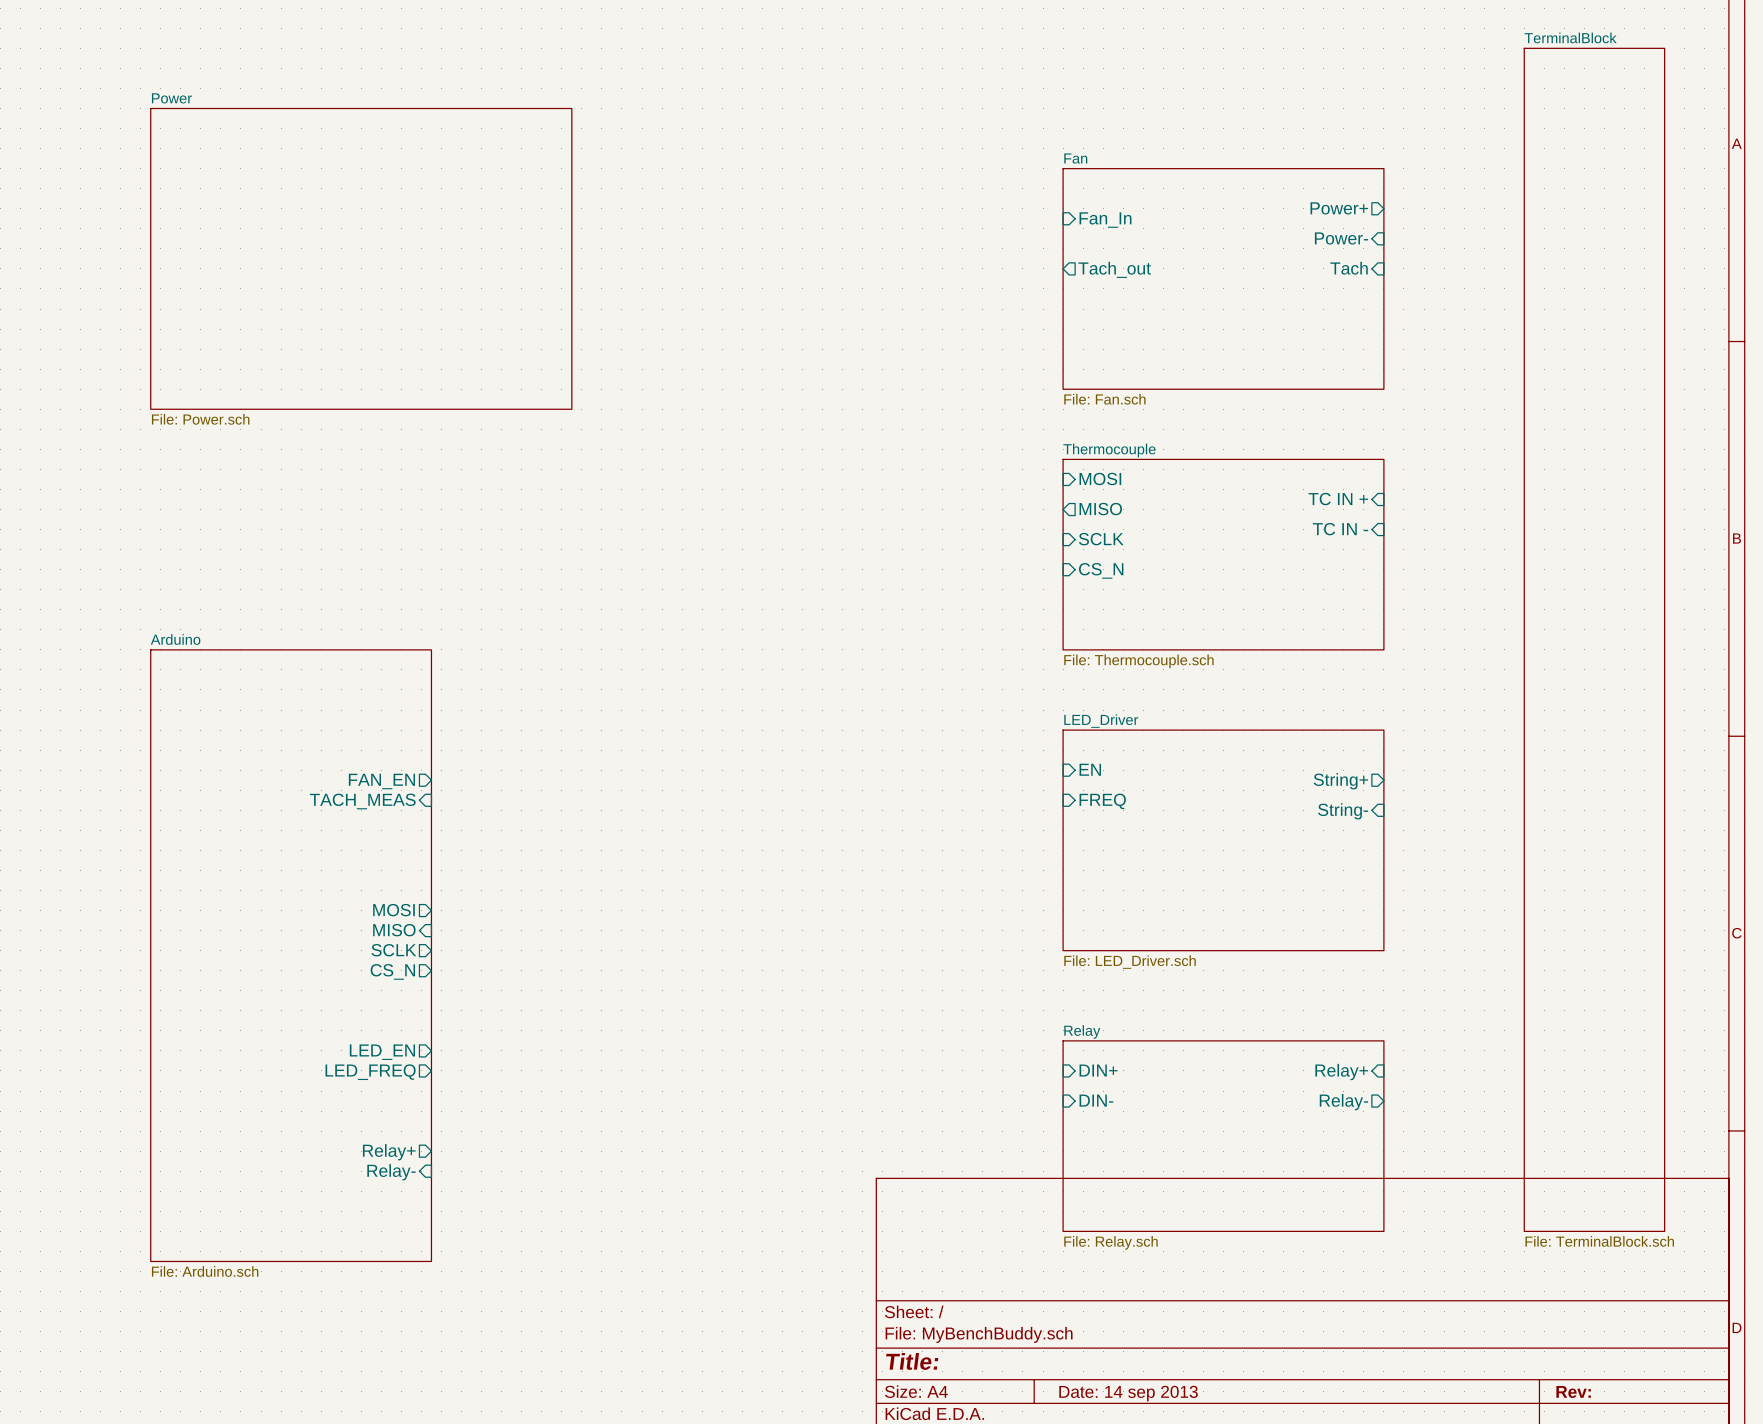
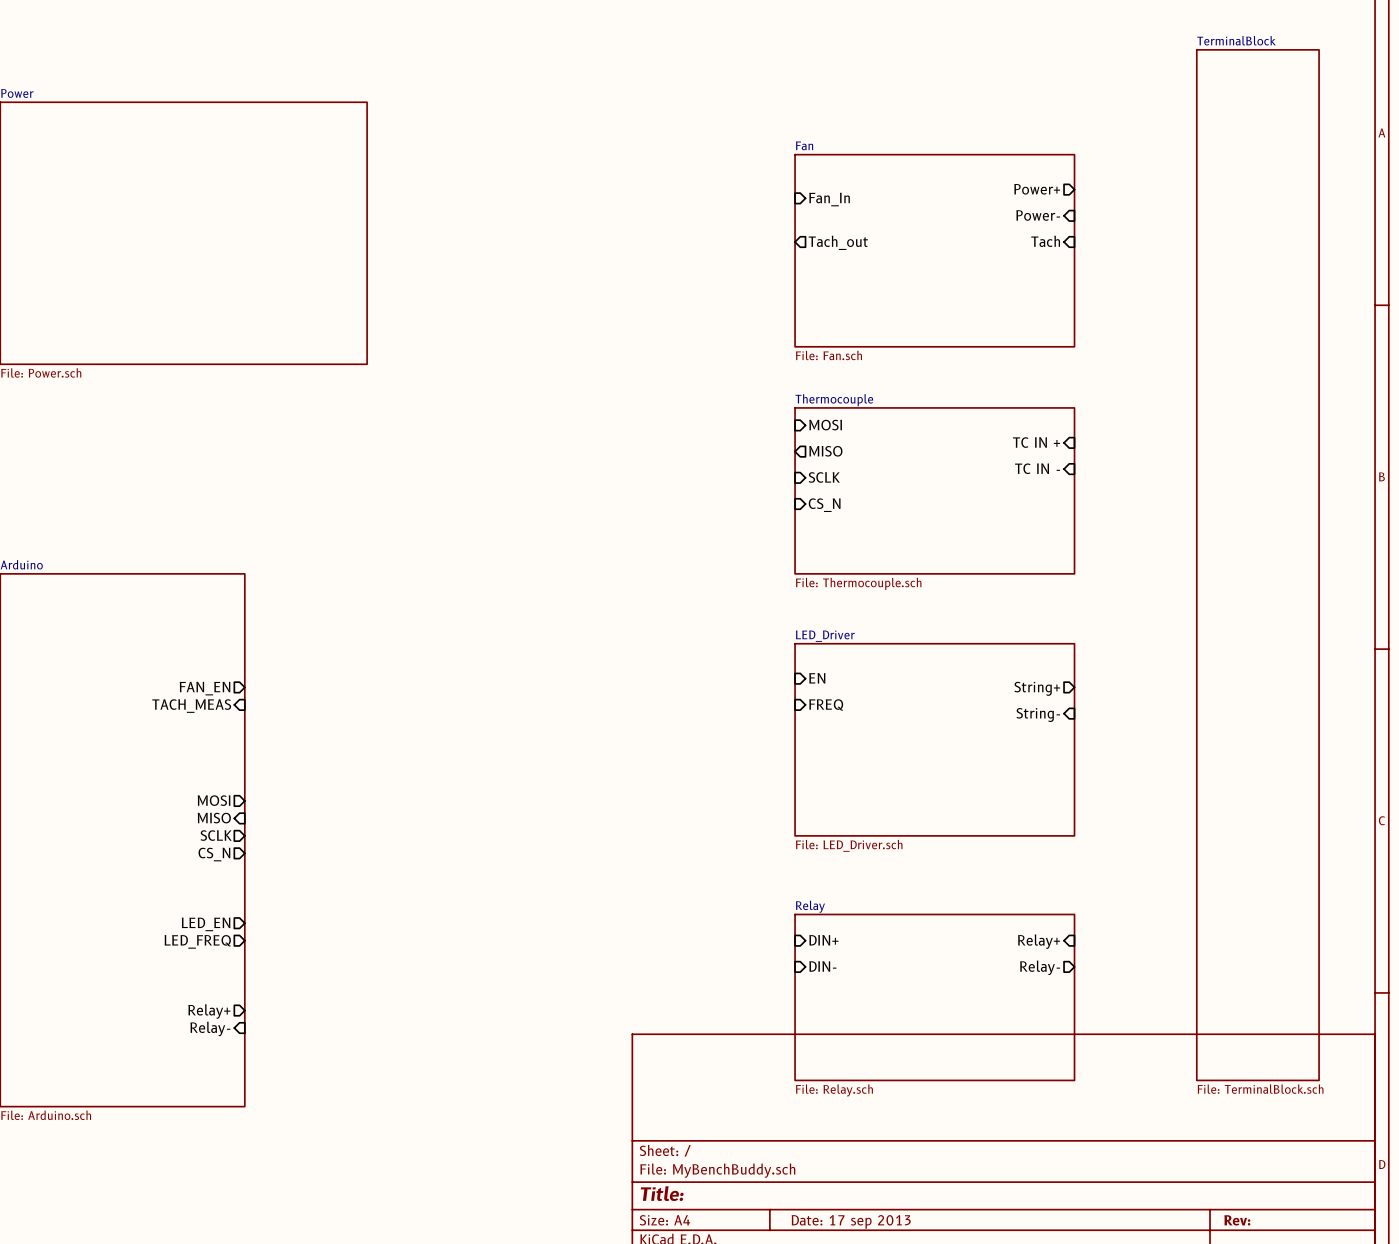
title block: Date: 14 sep 2013 (1128, 1393) -> Date: 17 sep 2013 (851, 1221)

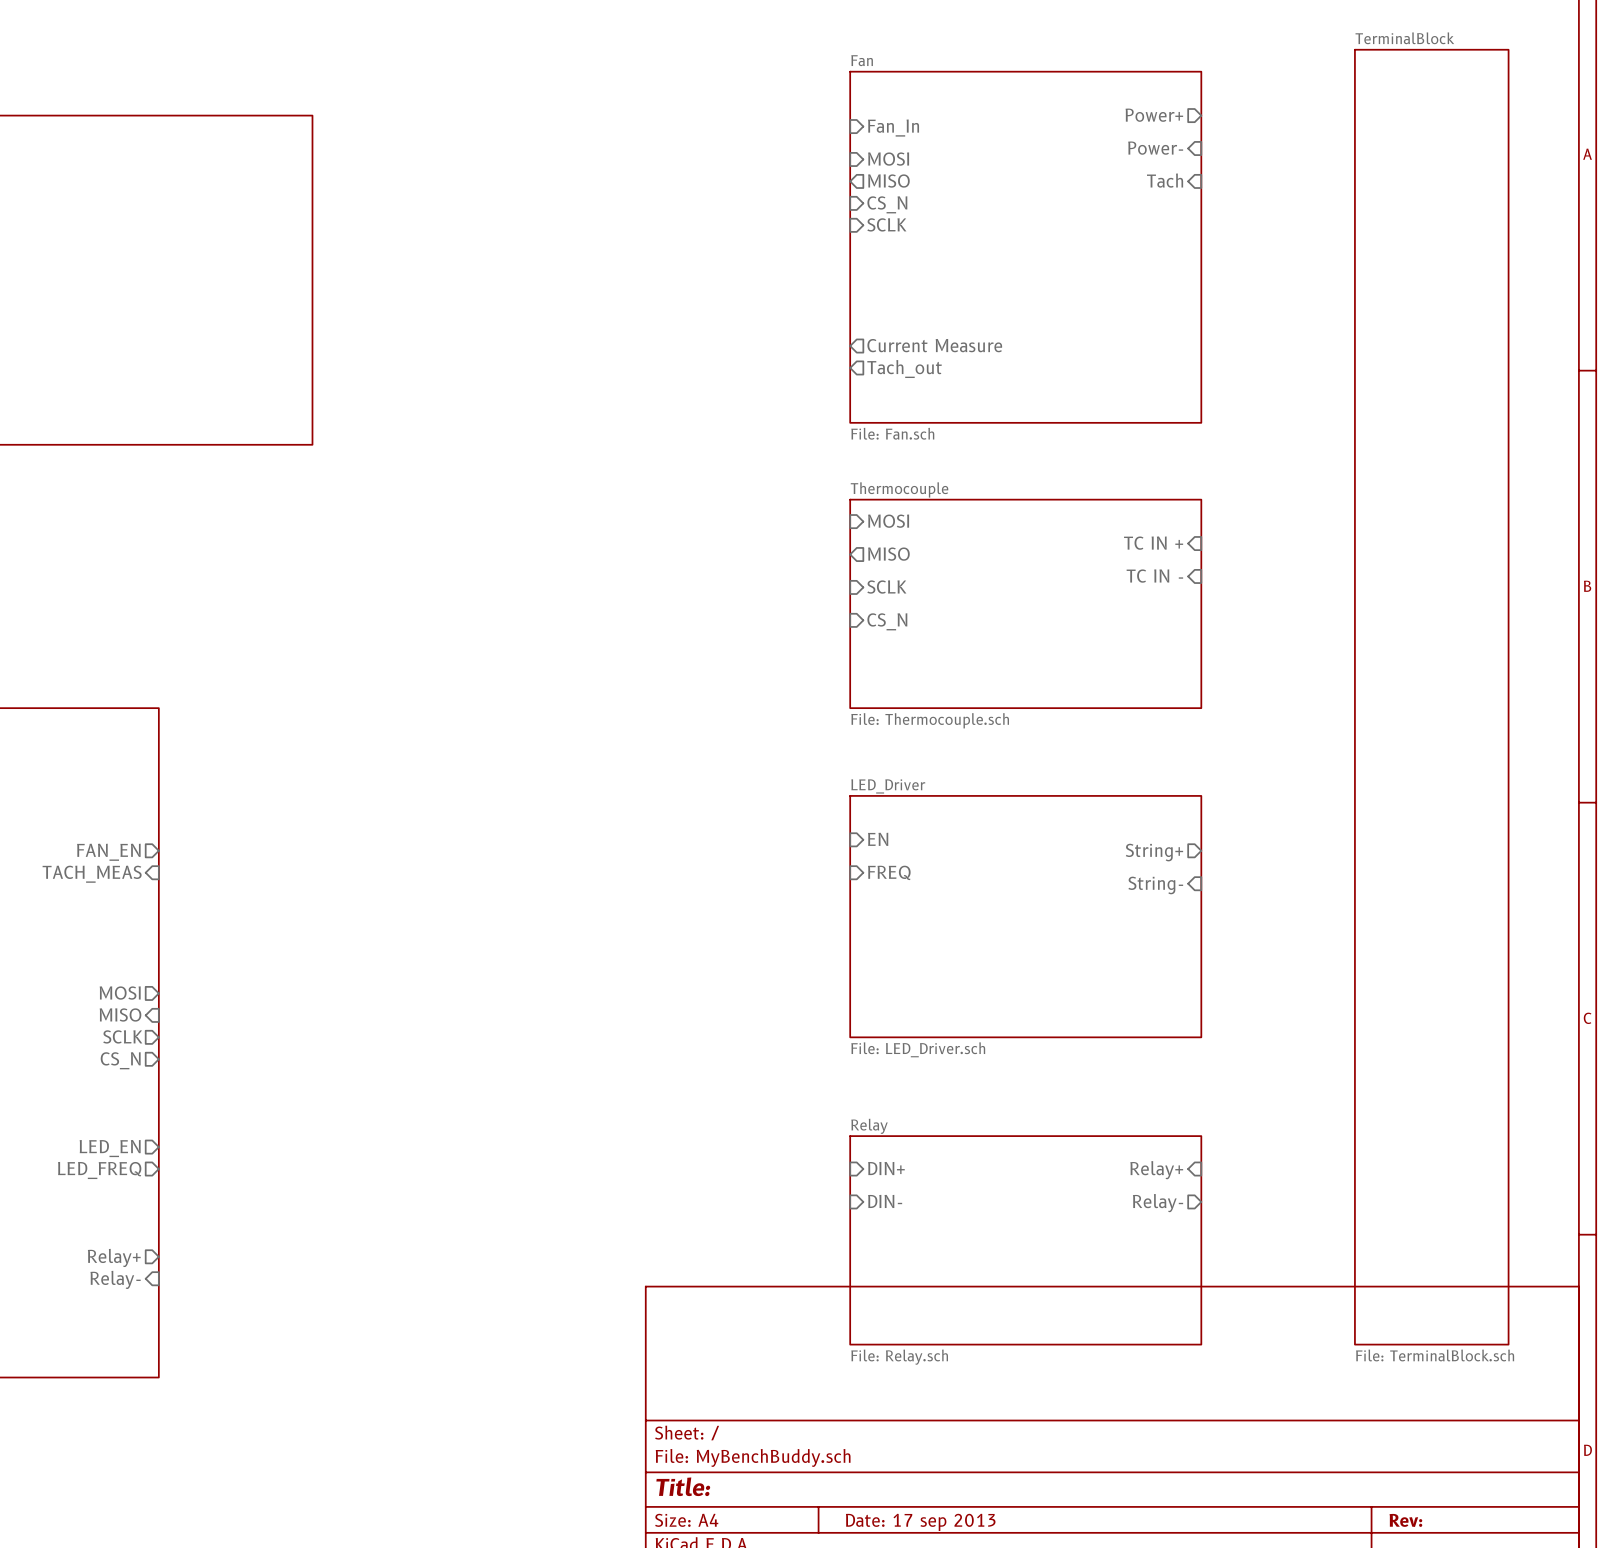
sheet pin: none -> MOSI (888, 159)
sheet pin: none -> MISO (888, 181)
sheet pin: none -> CS_N (887, 204)
sheet pin: none -> SCLK (886, 224)
sheet pin position: Power+ (1037, 189) -> Power+ (1154, 115)
sheet pin position: Fan_In (829, 199) -> Fan_In (893, 128)
sheet Fan: none -> File: Fan.sch (1025, 247)
sheet pin position: Power- (1038, 215) -> Power- (1155, 148)
sheet pin position: Tach (1045, 241) -> Tach (1165, 180)
sheet pin position: Tach_out (838, 242) -> Tach_out (904, 369)
sheet Fan: File: Fan.sch (934, 250) -> none
sheet pin: none -> Current Measure (934, 345)

